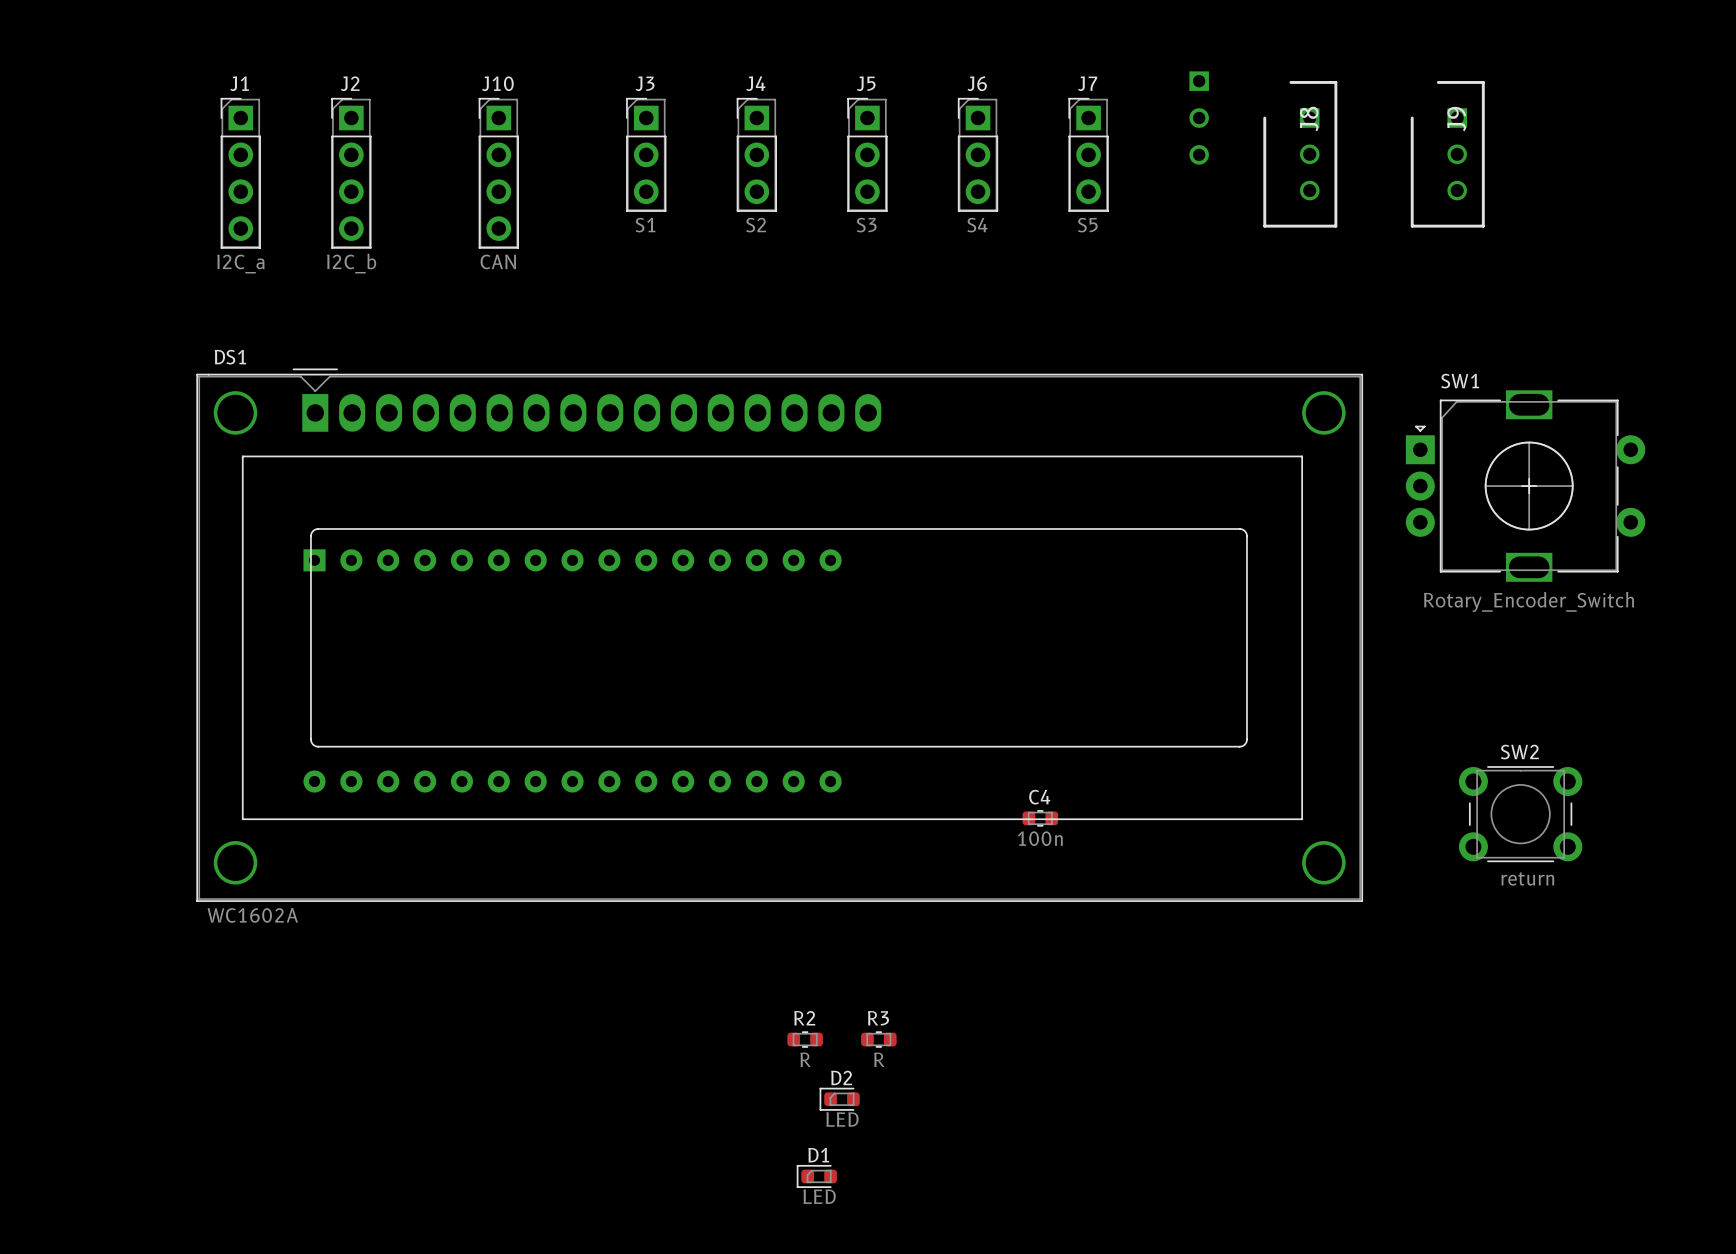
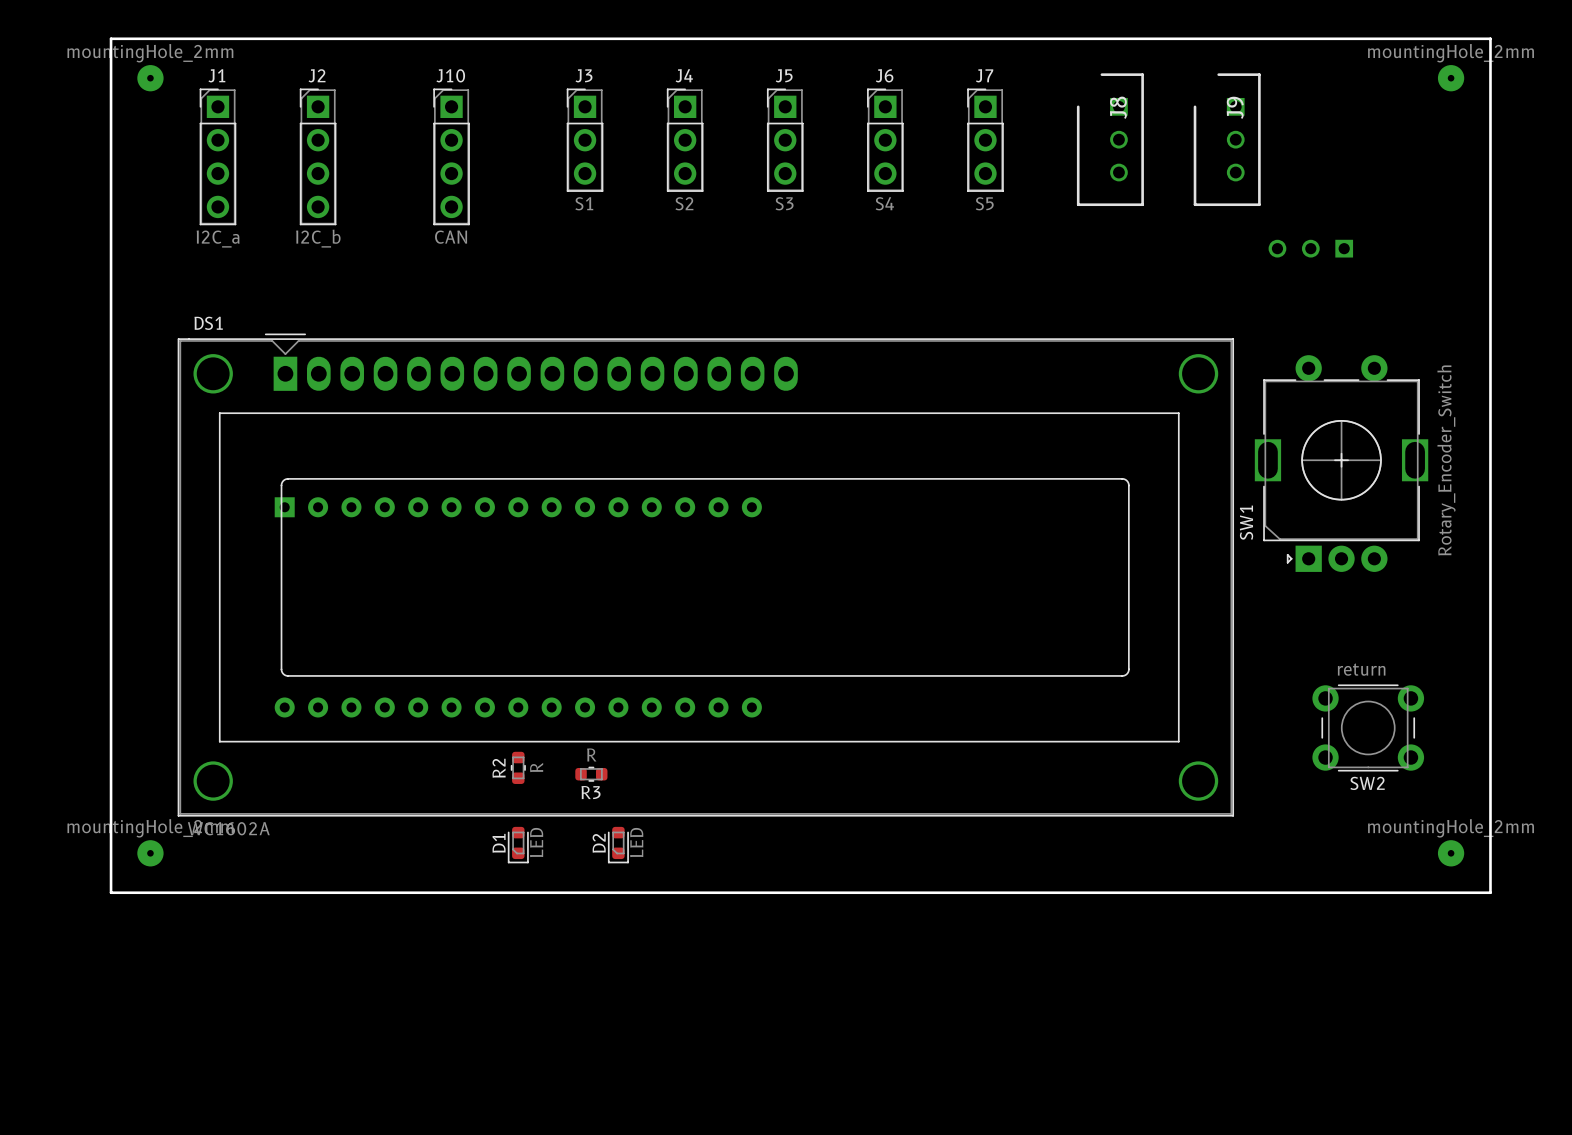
board edge: none -> (111, 38) (111, 892) (1490, 892) (1490, 38) (111, 38)
part: none -> mountingHole_2mm (150, 78)
part: none -> mountingHole_2mm (1451, 78)
part rotation: 0° (1199, 118) -> 90° clockwise (1310, 248)
part position: (1199, 118) -> (1310, 248)
J8 position: (1300, 154) -> (1110, 139)
J9 position: (1447, 154) -> (1227, 139)
SW1 rotation: 0° (1525, 486) -> 90° counterclockwise (1341, 463)
SW2 rotation: 0° (1520, 814) -> 180° (1368, 727)
C4: 100n (1040, 818) -> none
part: none -> mountingHole_2mm (150, 853)
part: none -> mountingHole_2mm (1451, 853)
R2 name position: R2 (804, 1018) -> R2 (499, 768)
R3 name position: R3 (878, 1018) -> R3 (591, 792)
R2 rotation: 0° (805, 1039) -> 90° clockwise (518, 767)
R2 position: (805, 1039) -> (518, 767)
R3 position: (878, 1039) -> (591, 774)
R2 value position: R (805, 1059) -> R (536, 767)
R3 value position: R (879, 1059) -> R (591, 754)
D2 rotation: 0° (839, 1099) -> 90° counterclockwise (618, 845)
D2 position: (839, 1099) -> (618, 845)
D1 rotation: 0° (816, 1176) -> 90° counterclockwise (518, 845)
D1 position: (816, 1176) -> (518, 845)

